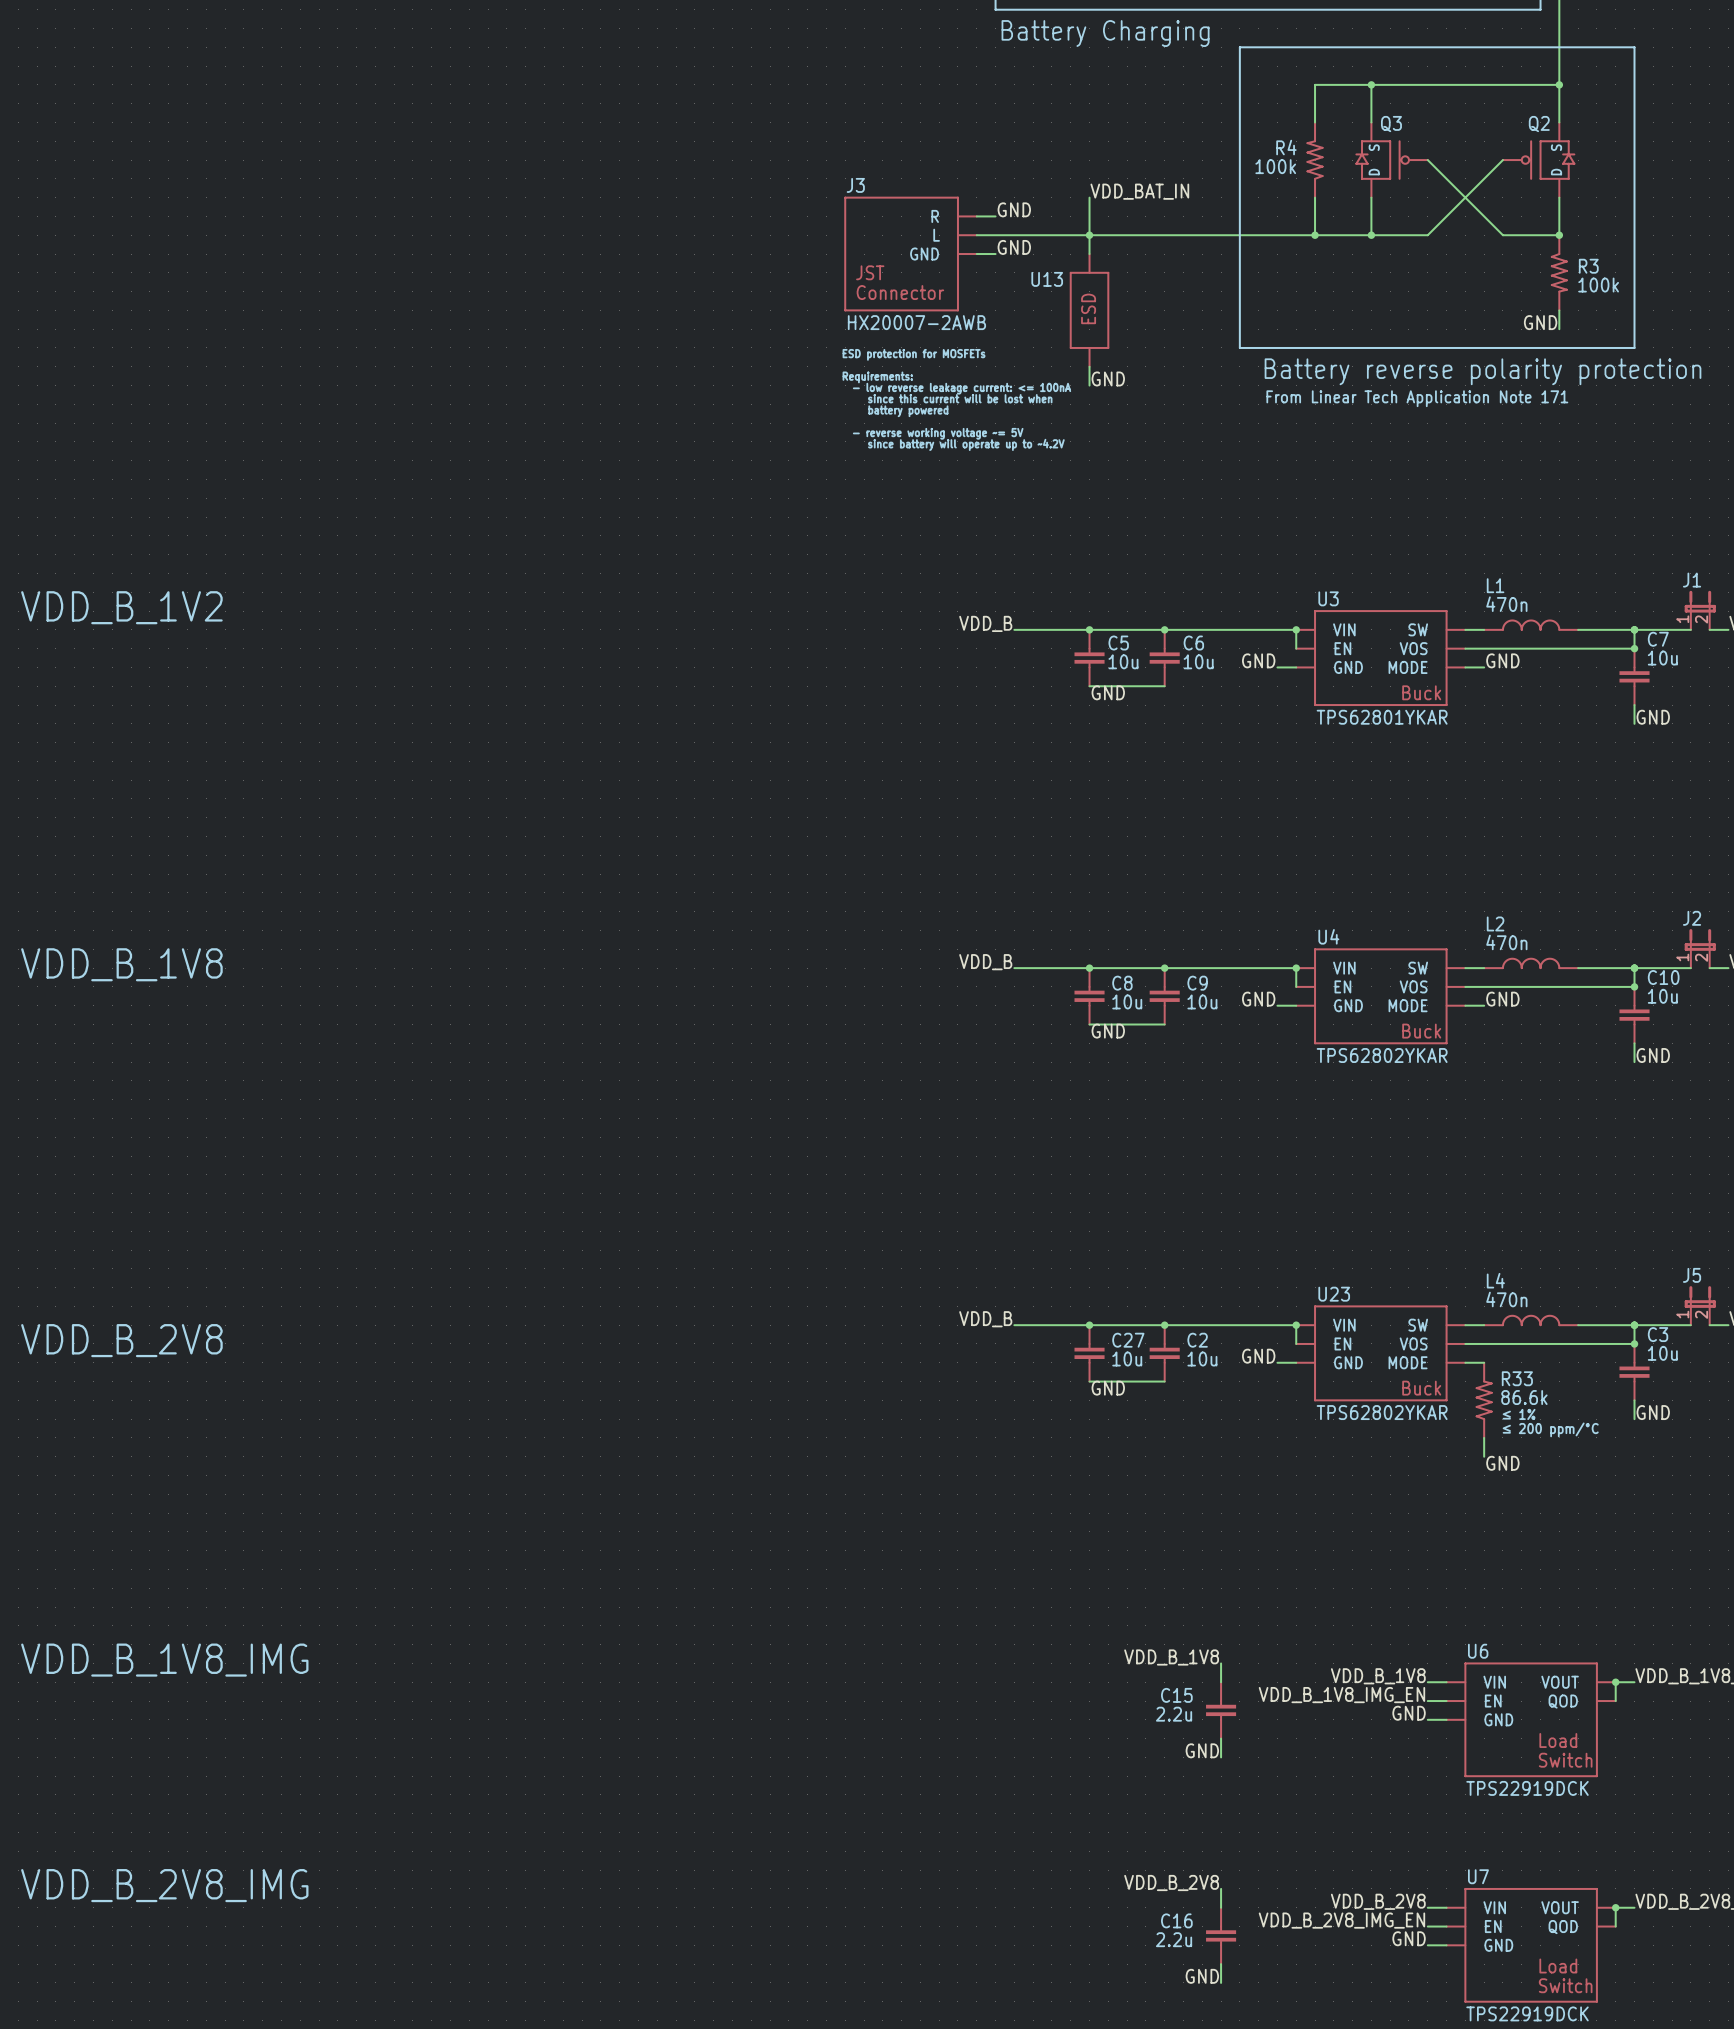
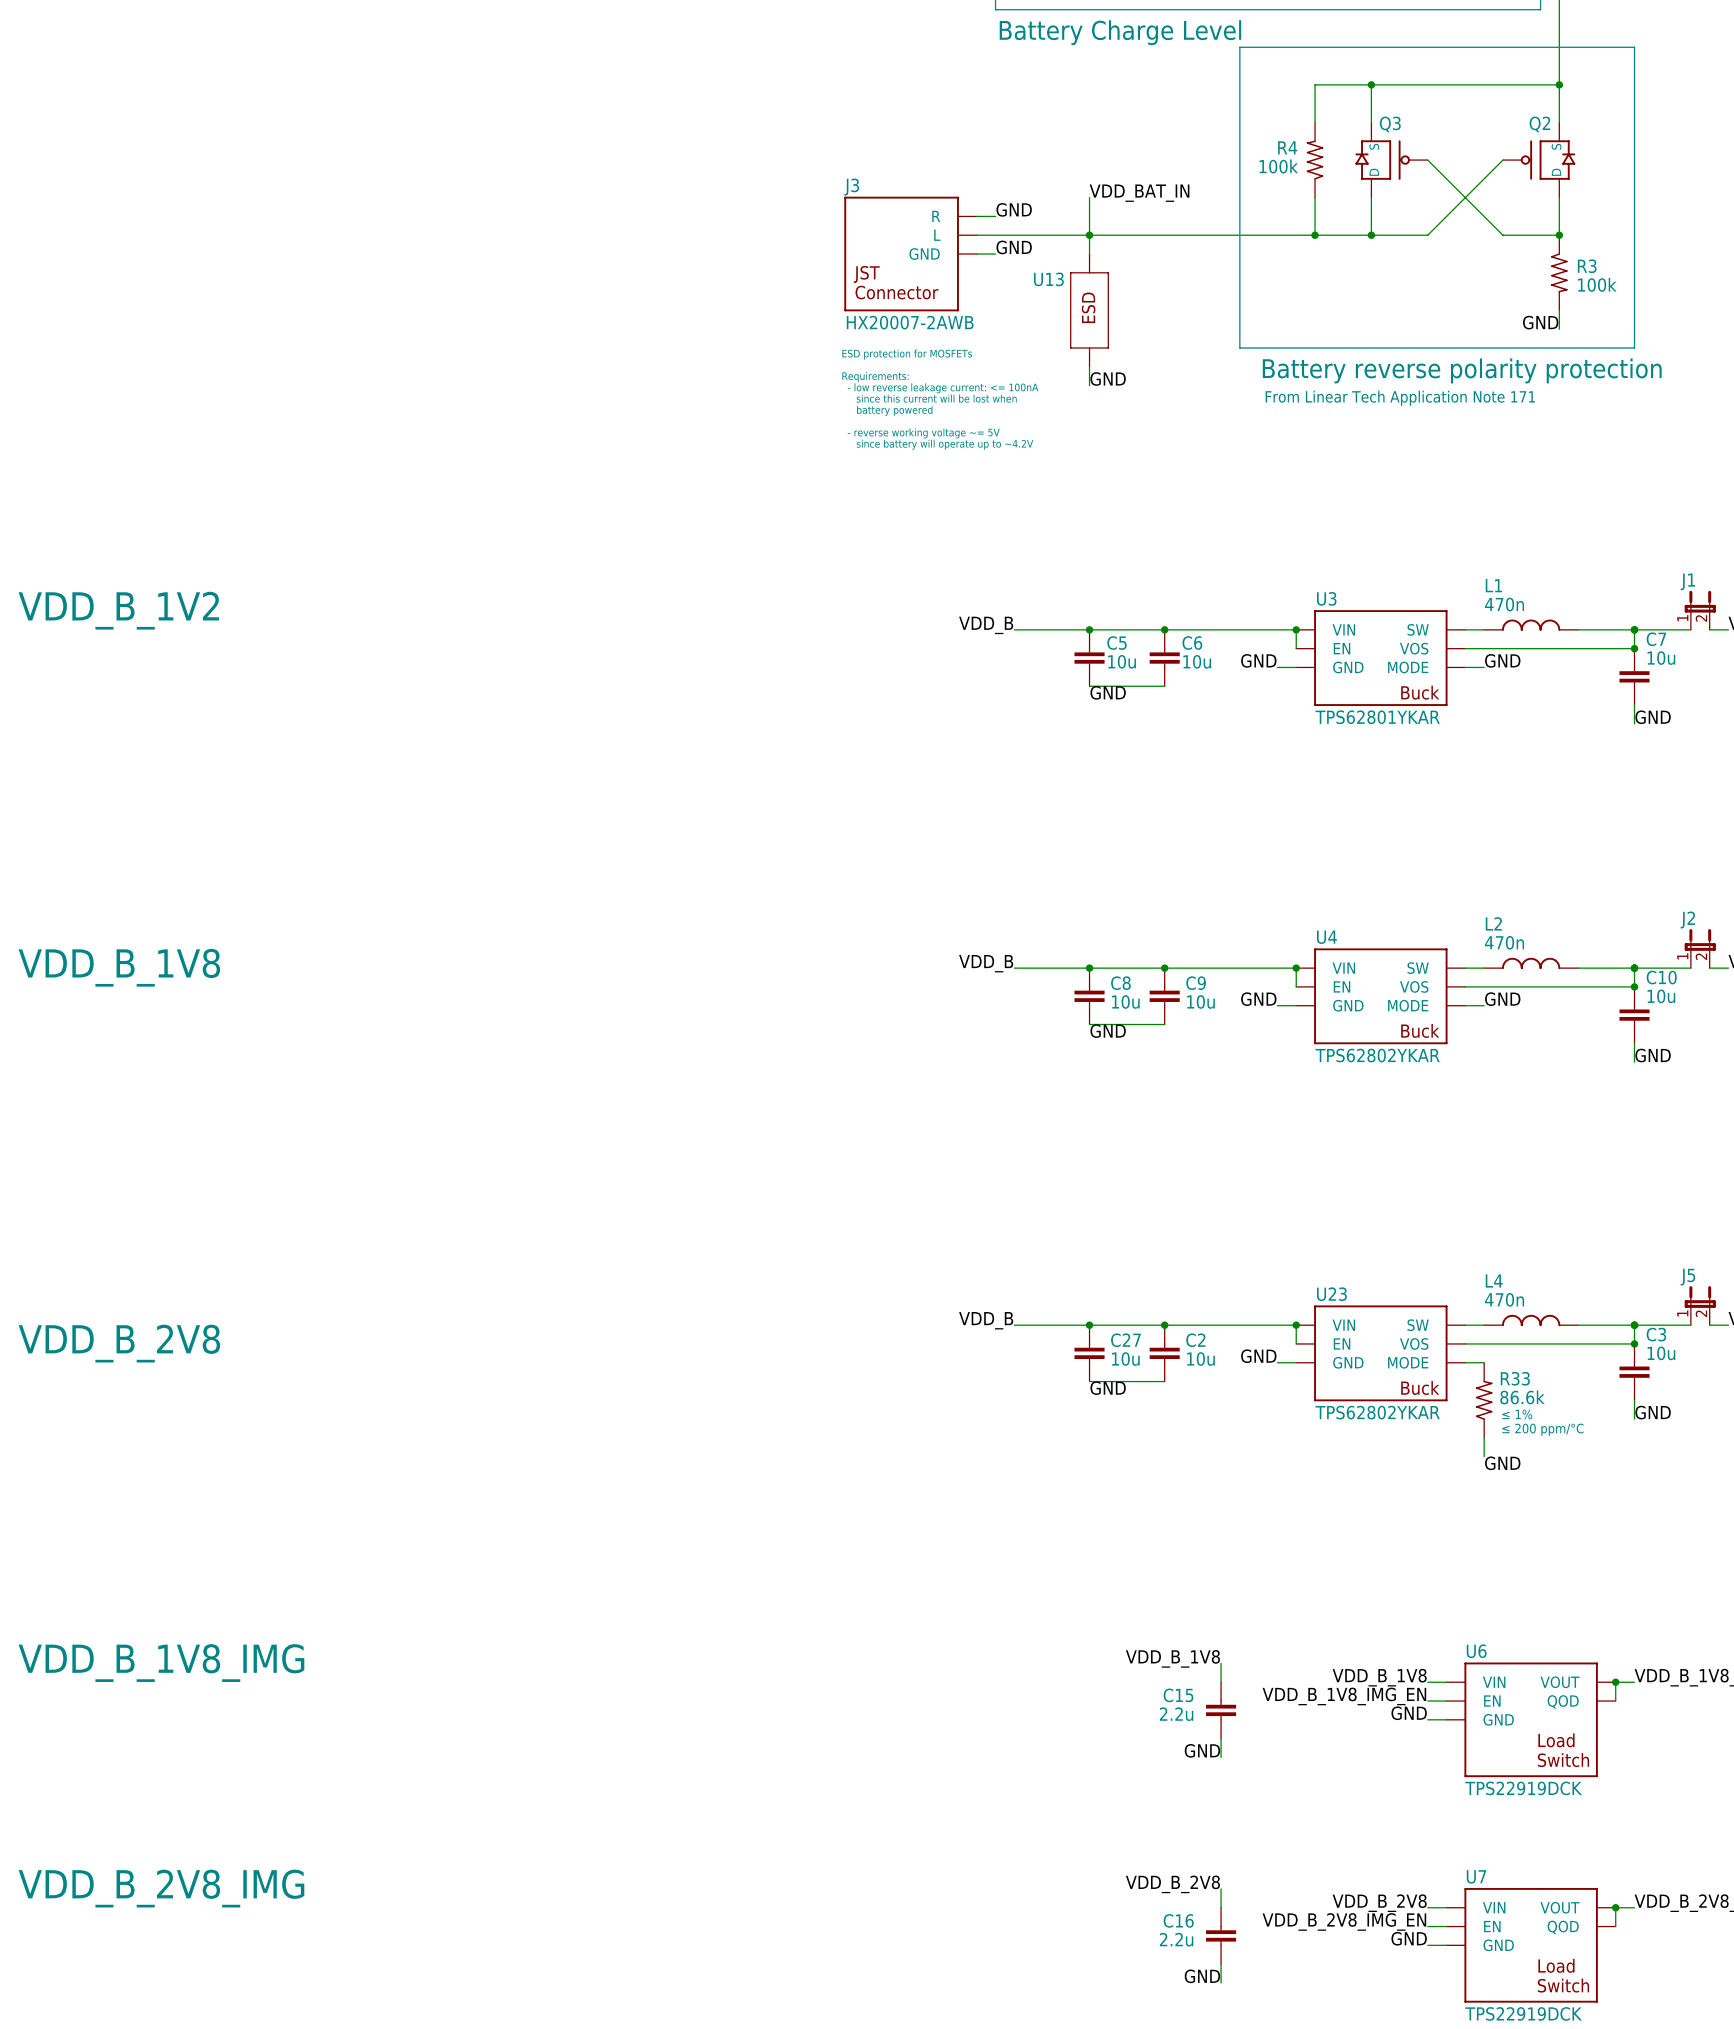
text: Battery Charging (1105, 33) -> Battery Charge Level (1120, 32)

